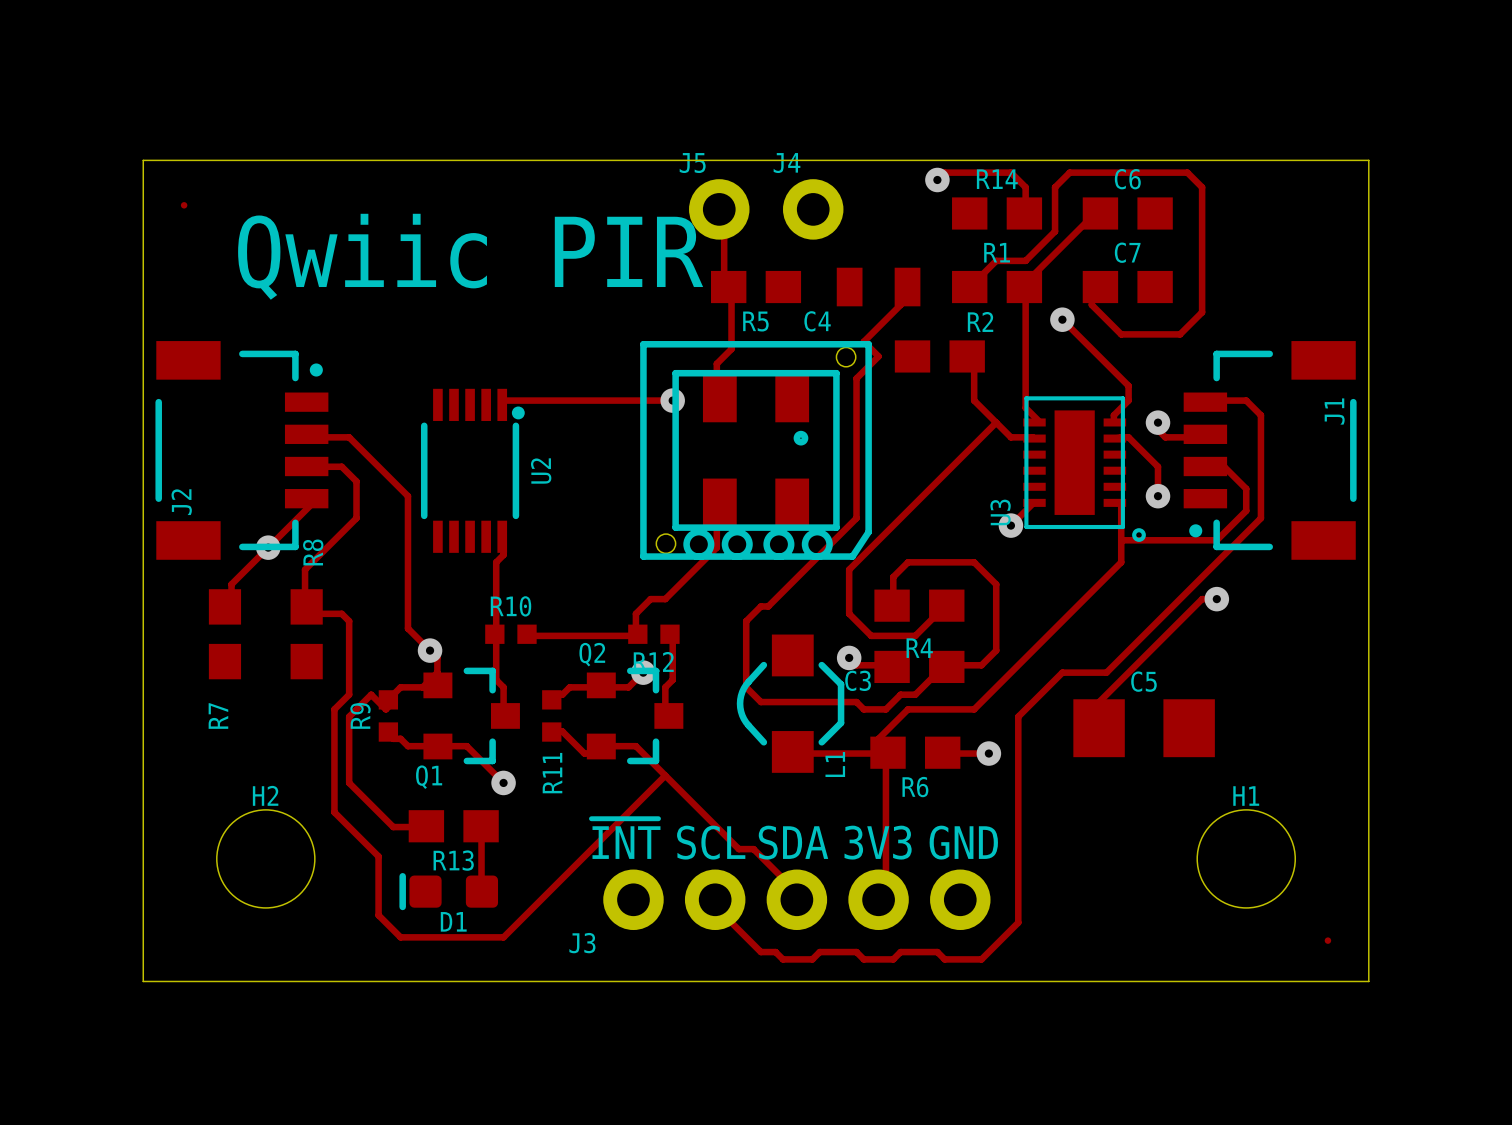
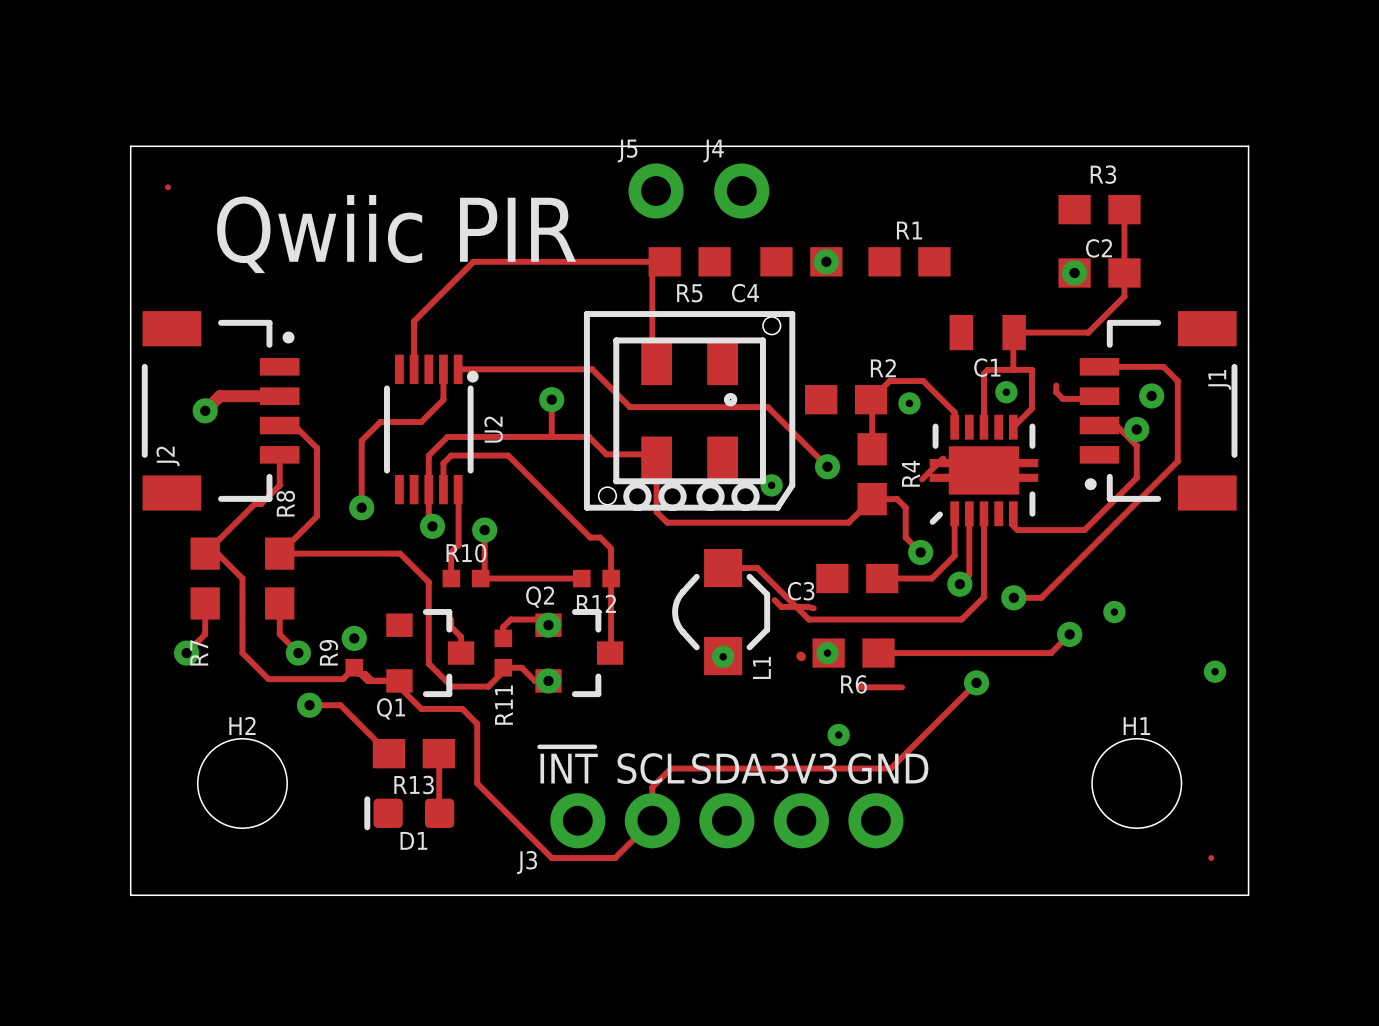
track: (937, 179) (944, 172) (1010, 172) (1025, 187) (1024, 213) -> none
via: (937, 179) -> none
track: (719, 209) (724, 209) (724, 282) (731, 290) (731, 349) (716, 363) (716, 393) (719, 398) -> (413, 321) (473, 261) (664, 261) (652, 274) (652, 359) (656, 363)
R14: (997, 213) -> none
track: (1100, 213) (1099, 216) (1091, 216) (1033, 275) (1033, 282) (1025, 290) (1025, 407) (1040, 422) (1034, 422) -> none
C6: (1127, 213) -> none
R3: none -> (1099, 209)
track: none -> (1124, 209) (1124, 296) (1088, 332) (1014, 332) (1013, 369)
C4 footprint: [836, 267, 921, 307] -> [760, 247, 843, 277]
via: none -> (826, 261)
track: (907, 287) (900, 290) (900, 304) (863, 341) (878, 356) (856, 378) (856, 518) (768, 606) (760, 606) (746, 621) (746, 687) (760, 702) (856, 702) (863, 709) (885, 709) (900, 694) (915, 694) (944, 665) (946, 666) (981, 665) (996, 650) (996, 584) (974, 562) (907, 562) (893, 577) (892, 605) -> none
track: (969, 287) (996, 260) (1025, 260) (1055, 231) (1055, 187) (1069, 172) (1187, 172) (1202, 187) (1202, 312) (1180, 334) (1121, 334) (1091, 304) (1091, 297) (1100, 287) -> none
C7: (1127, 287) -> none
via: none -> (1074, 272)
C2: none -> (1099, 272)
track: (1062, 319) (1128, 385) (1128, 400) (1113, 415) (1114, 422) -> none
via: (1062, 319) -> none
track: none -> (414, 321) (414, 369)
R2 position: (939, 356) -> (846, 399)
track: (967, 356) (974, 356) (974, 400) (1010, 437) (1034, 438) -> none
C1: none -> (987, 332)
track: (672, 400) (503, 400) (502, 404) -> (827, 466) (767, 407) (630, 407) (592, 369) (458, 369)
via: (672, 400) -> none
track: (1205, 402) (1246, 400) (1260, 415) (1260, 518) (1106, 672) (1062, 672) (1018, 716) (1018, 922) (981, 959) (944, 959) (937, 952) (900, 952) (893, 959) (863, 959) (856, 952) (819, 952) (812, 959) (782, 959) (775, 952) (760, 952) (709, 900) (715, 899) -> (1099, 366) (1163, 366) (1177, 381) (1177, 461) (1041, 597) (1013, 597)
track: none -> (443, 369) (443, 399) (421, 422) (380, 422) (361, 440) (361, 507)
track: (996, 422) (849, 569) (849, 613) (871, 635) (915, 635) (946, 605) -> none
via: (1158, 422) -> none
via: none -> (1006, 392)
track: (306, 434) (312, 437) (349, 437) (407, 496) (407, 628) (437, 657) (437, 672) (422, 687) -> (279, 396) (219, 396) (205, 410)
via: none -> (1151, 395)
track: none -> (551, 399) (551, 436)
via: none -> (551, 399)
track: (1114, 438) (1128, 437) (1158, 466) (1158, 496) -> none
via: none -> (909, 403)
via: none -> (205, 410)
track: (306, 466) (341, 466) (356, 481) (356, 518) (305, 569) (305, 606) (312, 613) (341, 613) (349, 621) (349, 694) (334, 709) (334, 812) (378, 856) (378, 915) (400, 937) (503, 937) (665, 775) -> (279, 425) (294, 425) (317, 448) (317, 516) (279, 553) (400, 553) (428, 582) (428, 663) (451, 686) (488, 686) (503, 671) (503, 667) (521, 667) (534, 680) (548, 680)
track: none -> (954, 427) (954, 412) (923, 381) (889, 381) (871, 399) (872, 449)
track: none -> (983, 427) (983, 373) (987, 369) (1031, 369) (1031, 408) (1013, 427)
U3: (1084, 469) -> none
via: none -> (1136, 429)
via: (1158, 496) -> none
track: (306, 498) (312, 503) (231, 584) (231, 606) (224, 606) -> (279, 454) (279, 485) (261, 504) (254, 504) (205, 553) (217, 553) (242, 578) (242, 653) (268, 679) (342, 679) (354, 667) (367, 680) (399, 680) (399, 687) (421, 708) (462, 708) (477, 723) (477, 783) (551, 858) (615, 858) (652, 820) (652, 787) (670, 768) (890, 768) (976, 682)
track: (719, 502) (716, 503) (716, 547) (665, 599) (650, 599) (635, 613) (637, 634) (635, 635) (532, 635) (527, 634) -> none
track: (1114, 502) (1121, 503) (1121, 562) (974, 709) (907, 709) (878, 738) (878, 746) (885, 753) -> none
track: (1246, 510) (1216, 540) (1121, 540) -> (1136, 466) (1136, 477) (1084, 530) (1017, 530) (1013, 525) (1013, 513)
via: none -> (827, 466)
part: none -> (983, 470)
via: (1010, 525) -> none
via: none -> (771, 485)
track: (502, 536) (503, 555) (496, 562) (494, 634) (496, 680) (503, 687) (505, 715) -> (458, 489) (458, 545) (451, 552) (451, 578)
via: (268, 547) -> none
via: none -> (361, 507)
track: none -> (954, 513) (954, 555) (931, 578) (882, 578)
track: none -> (969, 513) (969, 574) (959, 584)
track: none -> (983, 513) (983, 597) (961, 619) (808, 619) (757, 568) (723, 568)
track: none -> (432, 526) (428, 515) (428, 455) (447, 436) (589, 436) (606, 454) (652, 454) (656, 458) (656, 511) (667, 522) (848, 522) (872, 499) (897, 499) (905, 507) (905, 537) (920, 552)
via: none -> (432, 526)
track: none -> (484, 530) (484, 574) (480, 578) (581, 578)
via: none -> (484, 530)
track: (1216, 599) (1202, 599) (1099, 702) (1099, 728) -> none
via position: (1216, 599) -> (1114, 612)
R4 rotation: 0° (919, 605) -> 90° clockwise (872, 474)
R4 position: (919, 605) -> (872, 474)
via: none -> (920, 552)
track: (669, 634) (672, 635) (672, 680) (665, 687) (665, 709) (668, 715) -> (443, 489) (443, 463) (451, 455) (508, 455) (590, 537) (600, 537) (611, 548) (610, 653)
via: none -> (959, 584)
via: (430, 650) -> none
via: none -> (1013, 597)
via: (849, 657) -> none
track: none -> (205, 603) (205, 634) (186, 653)
track: none -> (279, 603) (279, 634) (298, 653)
C3 position: (919, 666) -> (857, 578)
track: (643, 672) (628, 687) (606, 687) (601, 685) (599, 687) (569, 687) (562, 694) (555, 694) (551, 699) -> (548, 625) (542, 619) (510, 619) (503, 626) (503, 638)
via: (643, 672) -> none
track: none -> (451, 619) (451, 626) (461, 636) (461, 653)
track: (437, 685) (437, 687) (400, 687) (388, 699) (393, 702) (385, 709) (371, 694) (349, 716) (349, 782) (393, 827) (426, 826) -> (309, 705) (340, 705) (388, 753)
via: none -> (548, 625)
track: none -> (1069, 634) (1051, 653) (878, 653)
via: none -> (1069, 634)
via: none -> (354, 638)
L1 position: (790, 703) -> (721, 612)
via: none -> (186, 653)
via: none -> (298, 653)
via: none -> (827, 653)
track: none -> (800, 656) (801, 656)
via: none -> (723, 656)
C5: (1144, 728) -> none
track: (551, 732) (562, 731) (584, 753) (599, 753) (601, 746) (635, 746) (738, 849) (753, 849) (797, 893) (796, 899) -> none
via: none -> (1215, 671)
track: (437, 746) (466, 746) (503, 782) -> none
via: none -> (548, 680)
via: none -> (976, 682)
track: (792, 751) (797, 753) (885, 753) -> none
R6 position: (915, 752) -> (853, 653)
track: (885, 753) (885, 885) (878, 893) (878, 899) -> none
via: (988, 753) -> none
via: none -> (309, 705)
via: (503, 782) -> none
via: none -> (838, 735)

